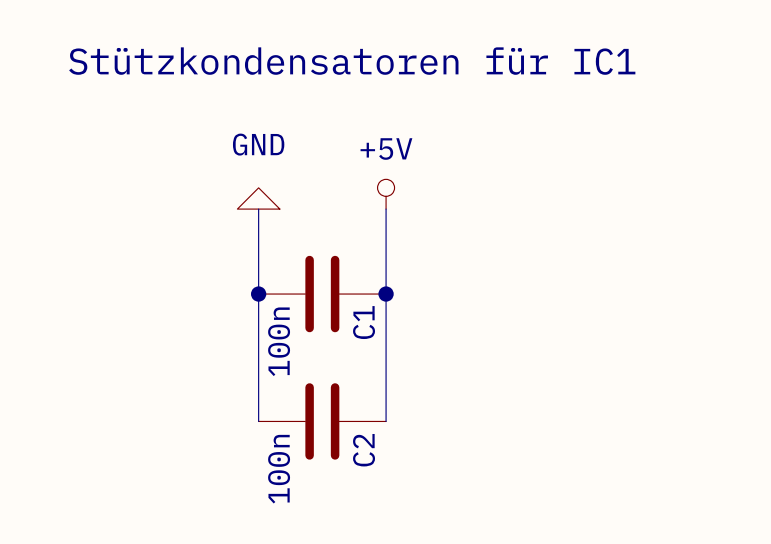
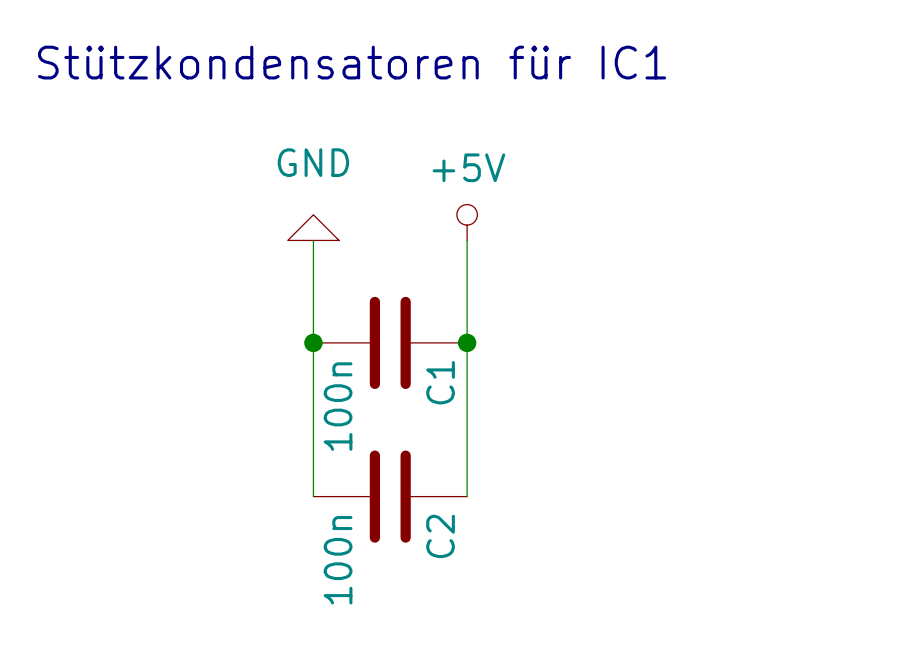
text position: Stützkondensatoren für IC1 (352, 61) -> Stützkondensatoren für IC1 (352, 62)

